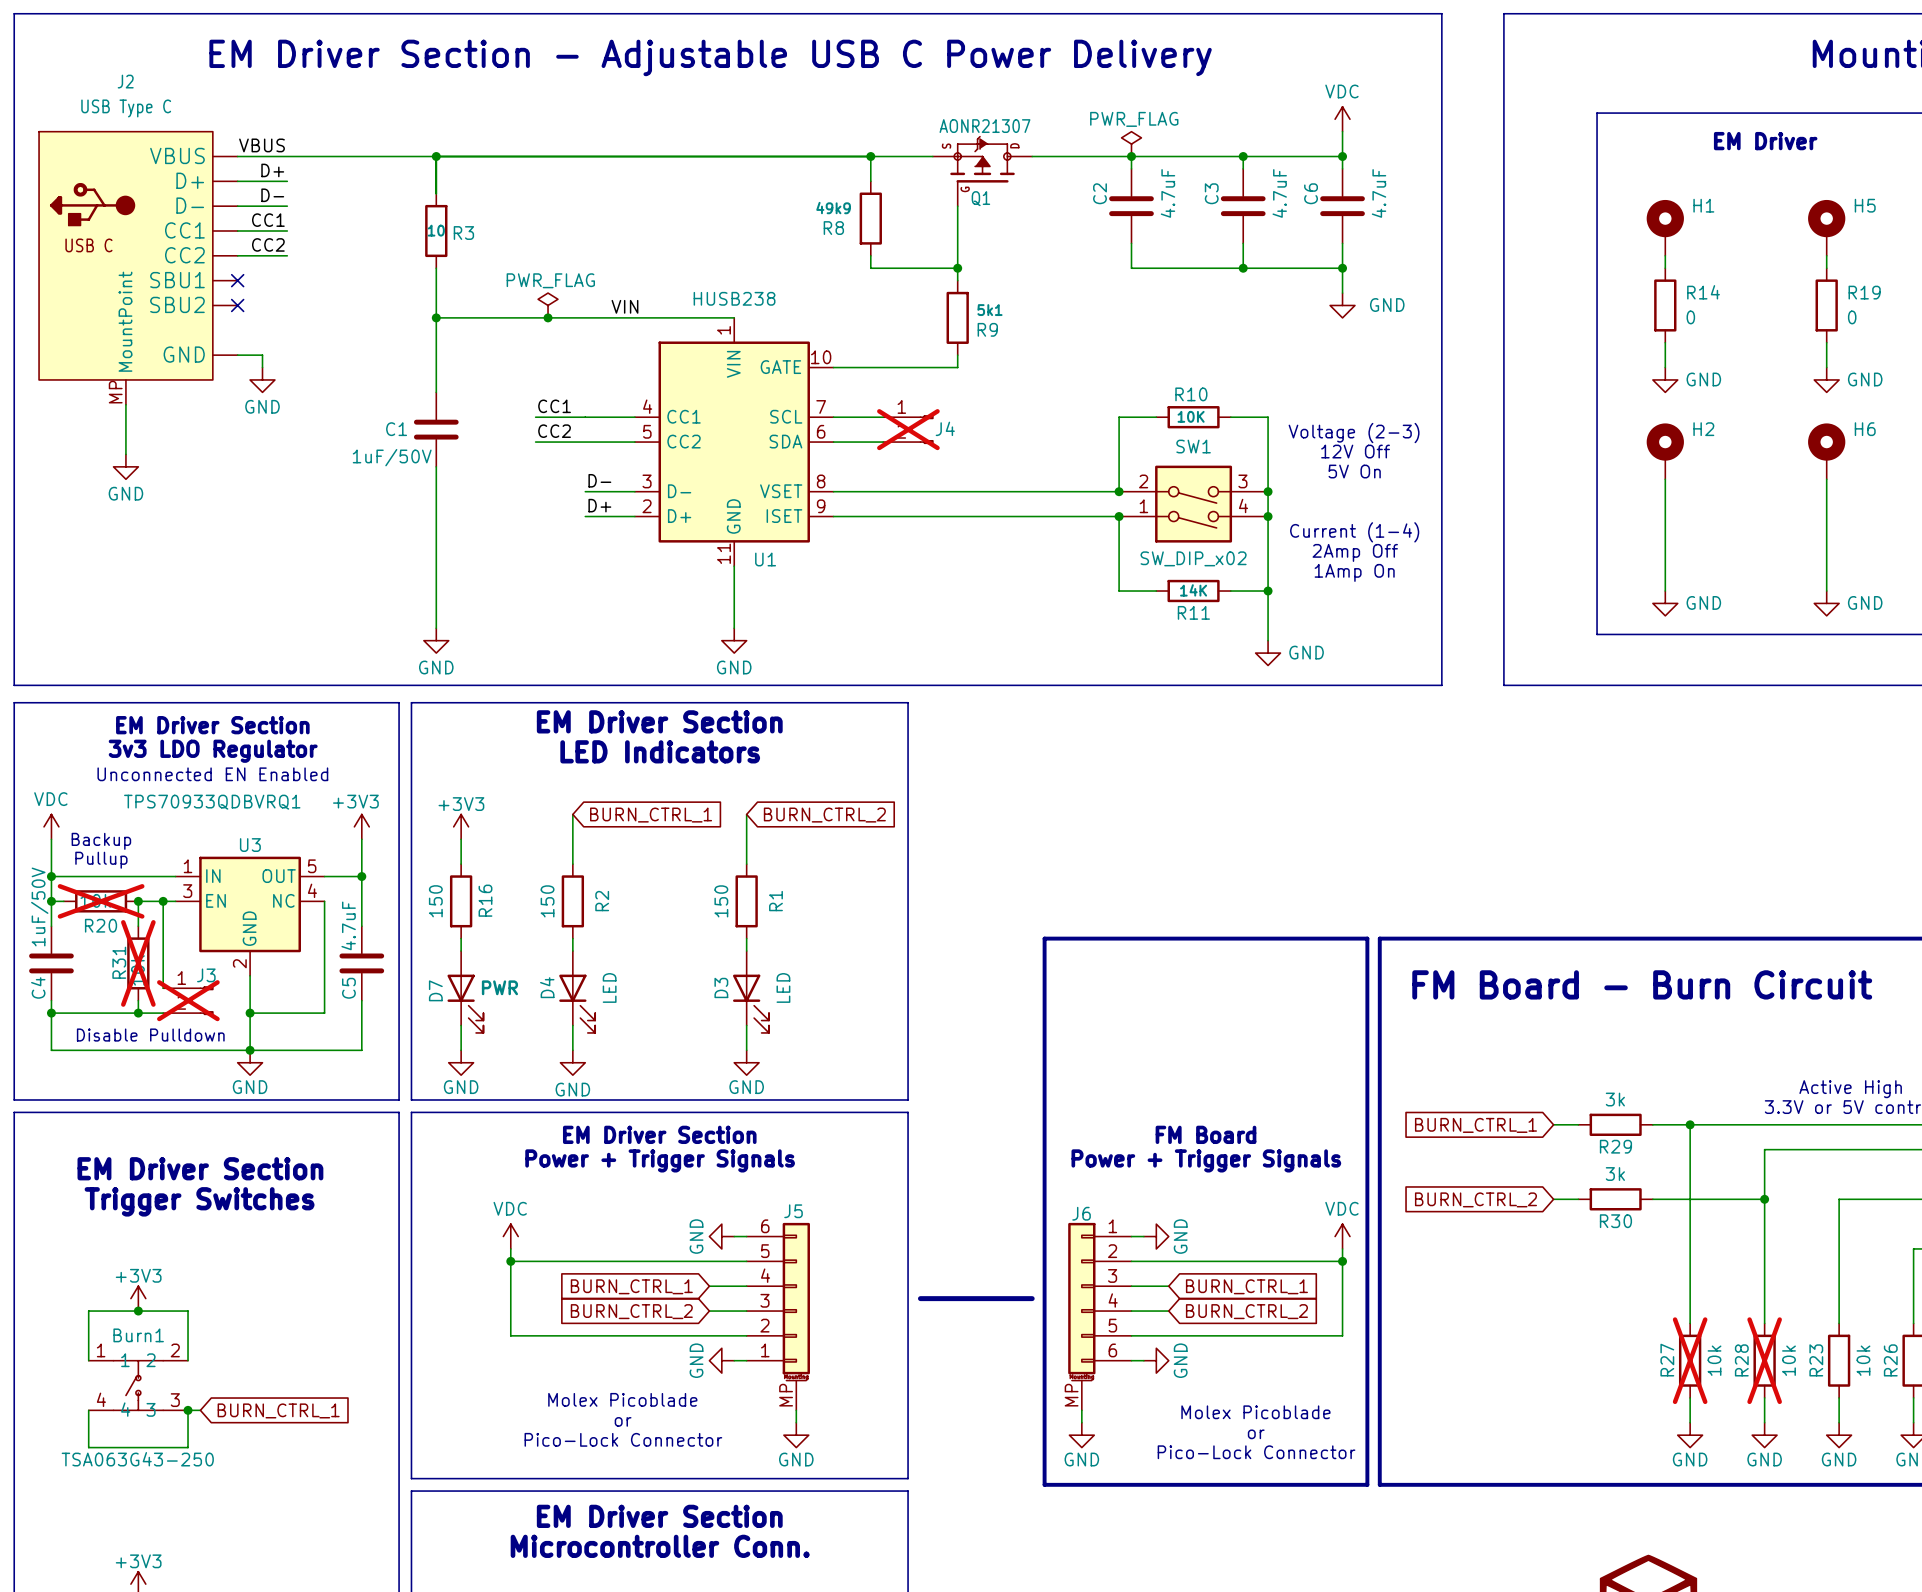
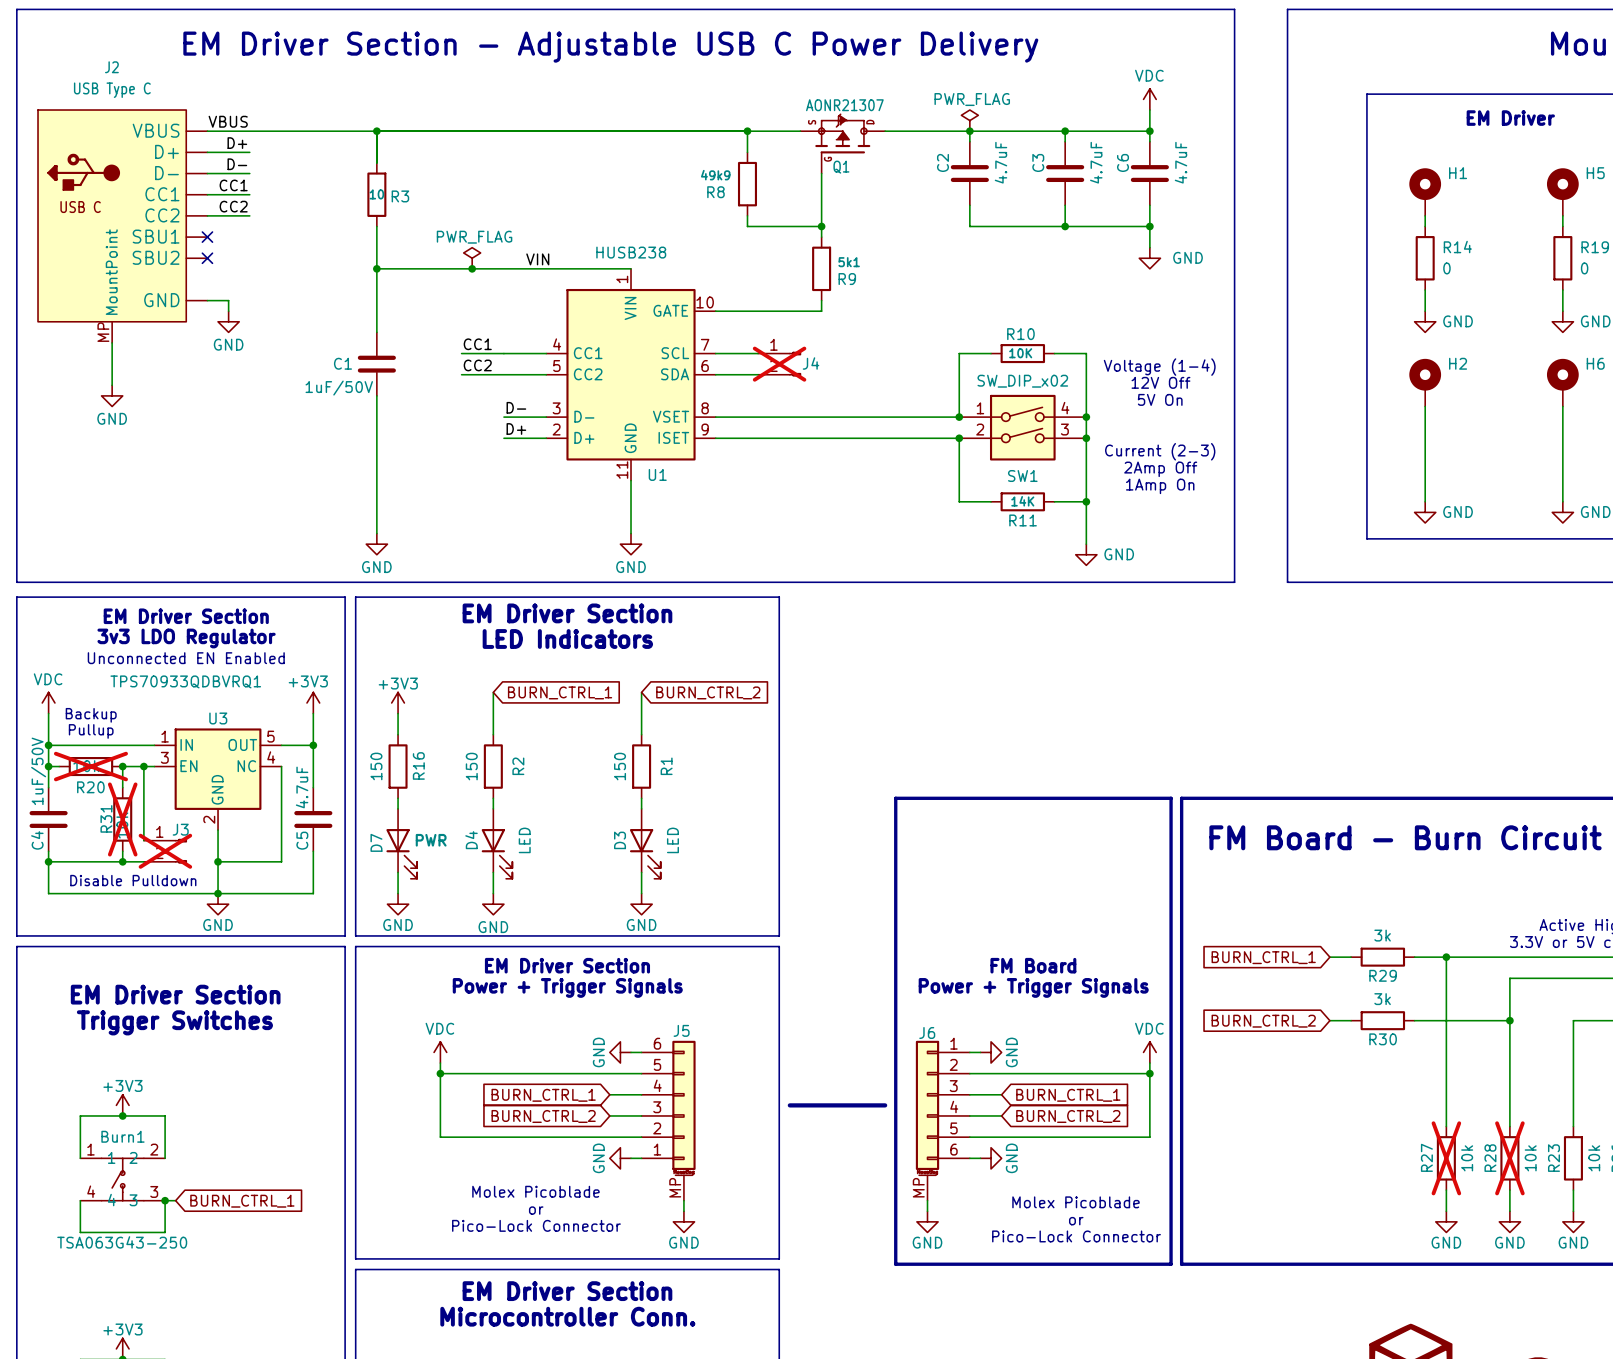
text: Voltage (2-3) (1354, 433) -> Voltage (1-4) (1159, 367)
SW1 flip: as is (1193, 504) -> up-down (1022, 427)
text: Current (1-4) (1354, 532) -> Current (2-3) (1160, 451)

